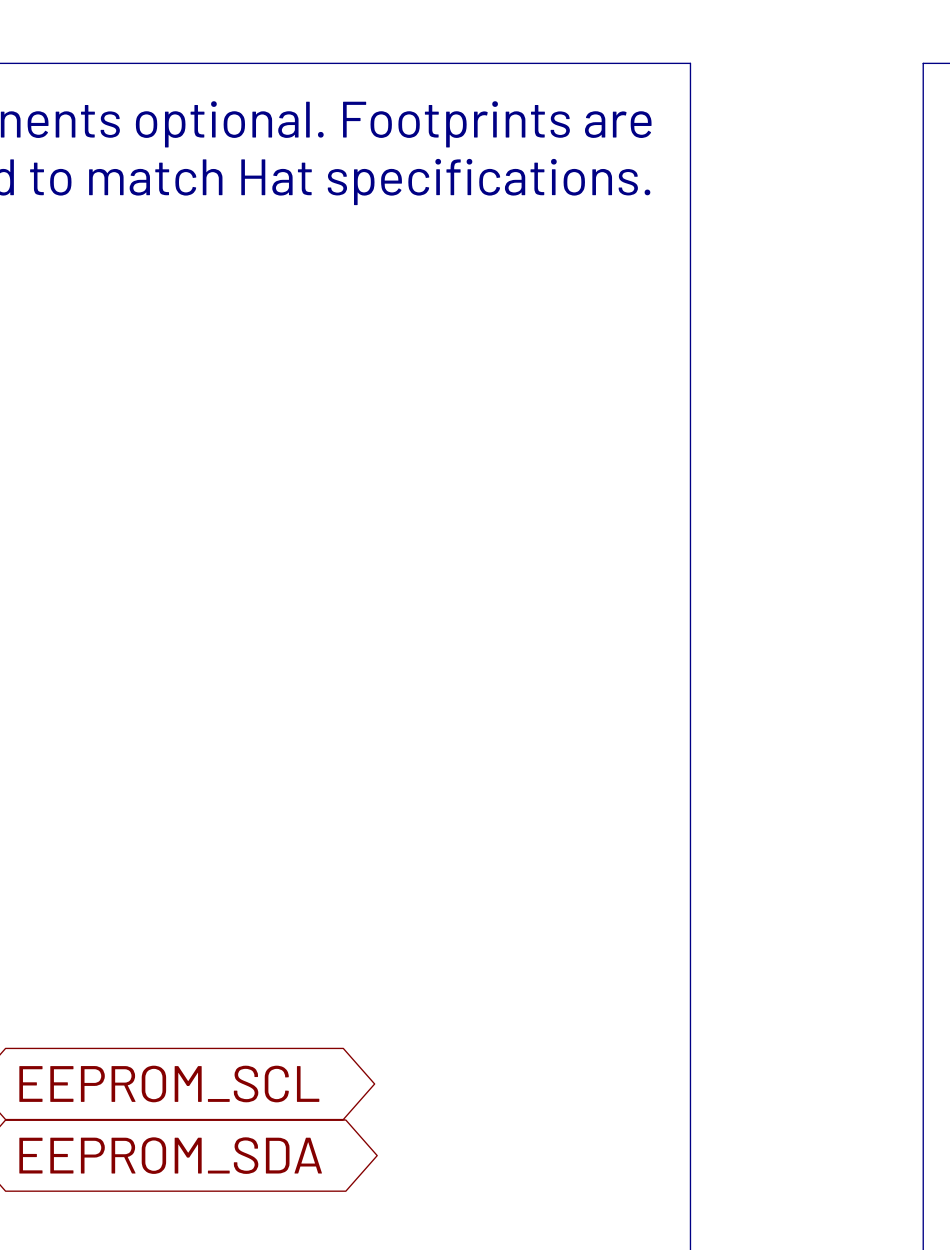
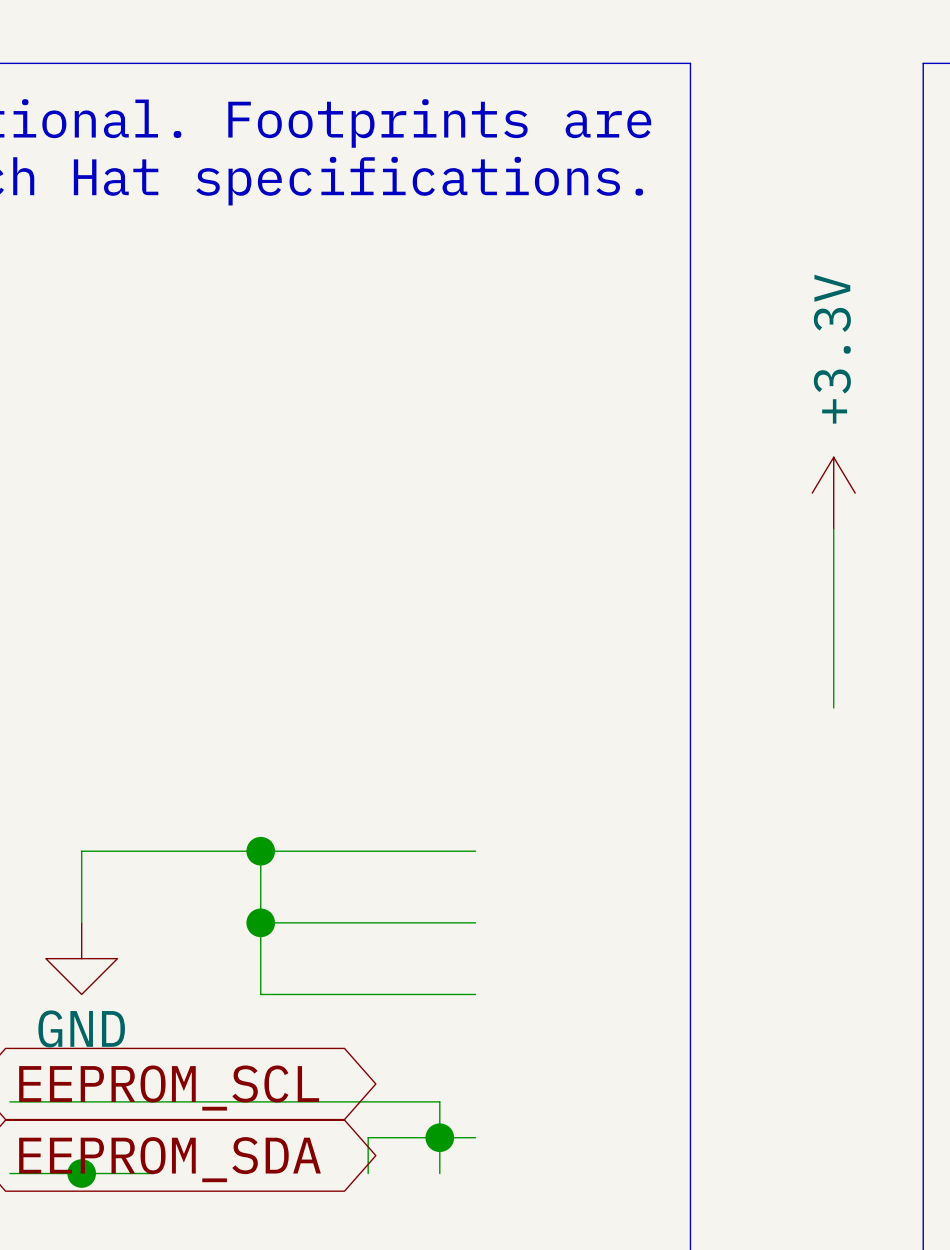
power symbol: none -> +3.3V (833, 493)
wire: none -> (833, 528) (833, 707)
wire: none -> (260, 851) (260, 994) (475, 994)
junction: none -> (260, 851)
wire: none -> (475, 851) (81, 851) (81, 922)
wire: none -> (260, 922) (475, 922)
junction: none -> (260, 922)
power symbol: none -> GND (81, 958)
wire: none -> (10, 1101) (439, 1101) (439, 1173)
junction: none -> (439, 1137)
wire: none -> (475, 1137) (368, 1137) (368, 1173)
wire: none -> (10, 1173) (153, 1173)
junction: none -> (81, 1173)

